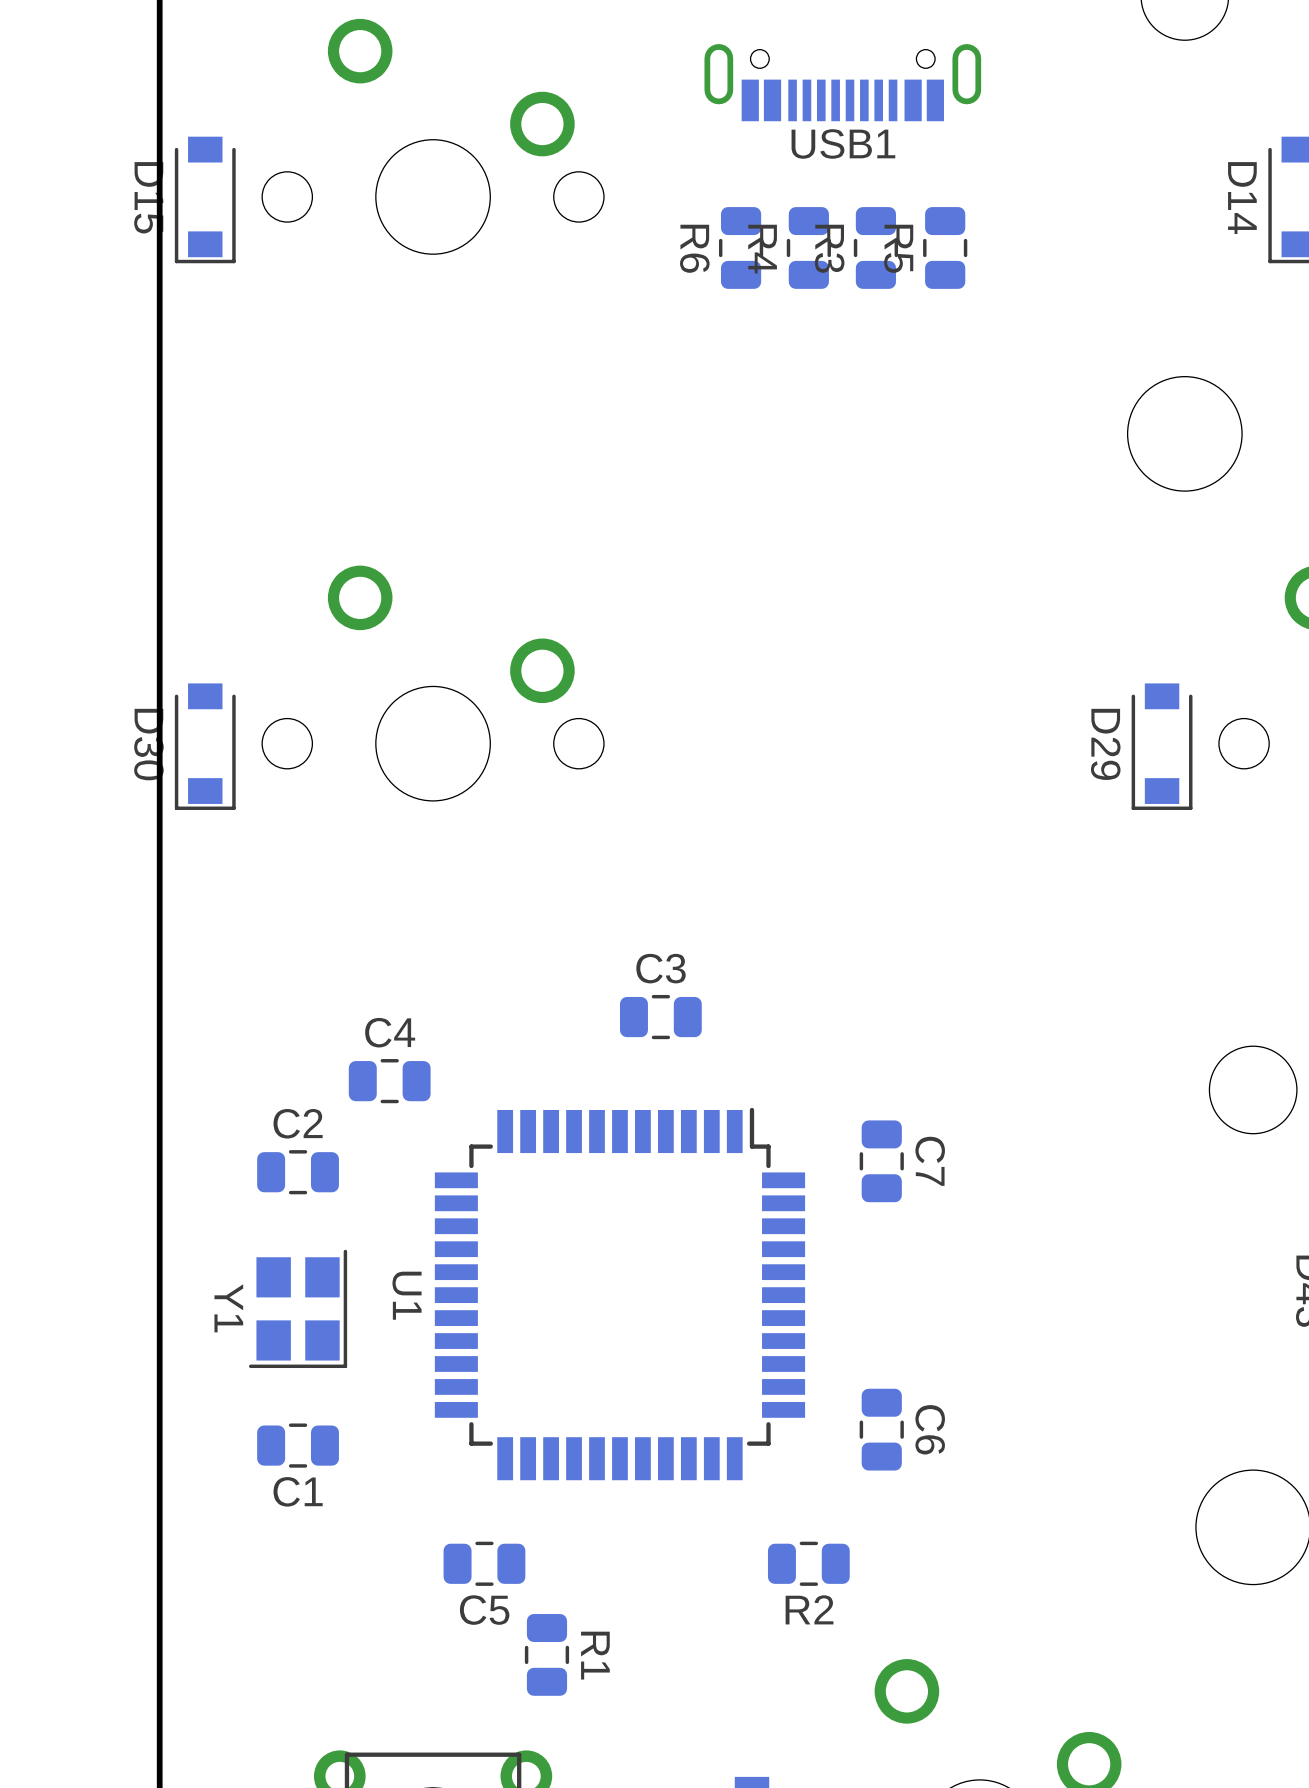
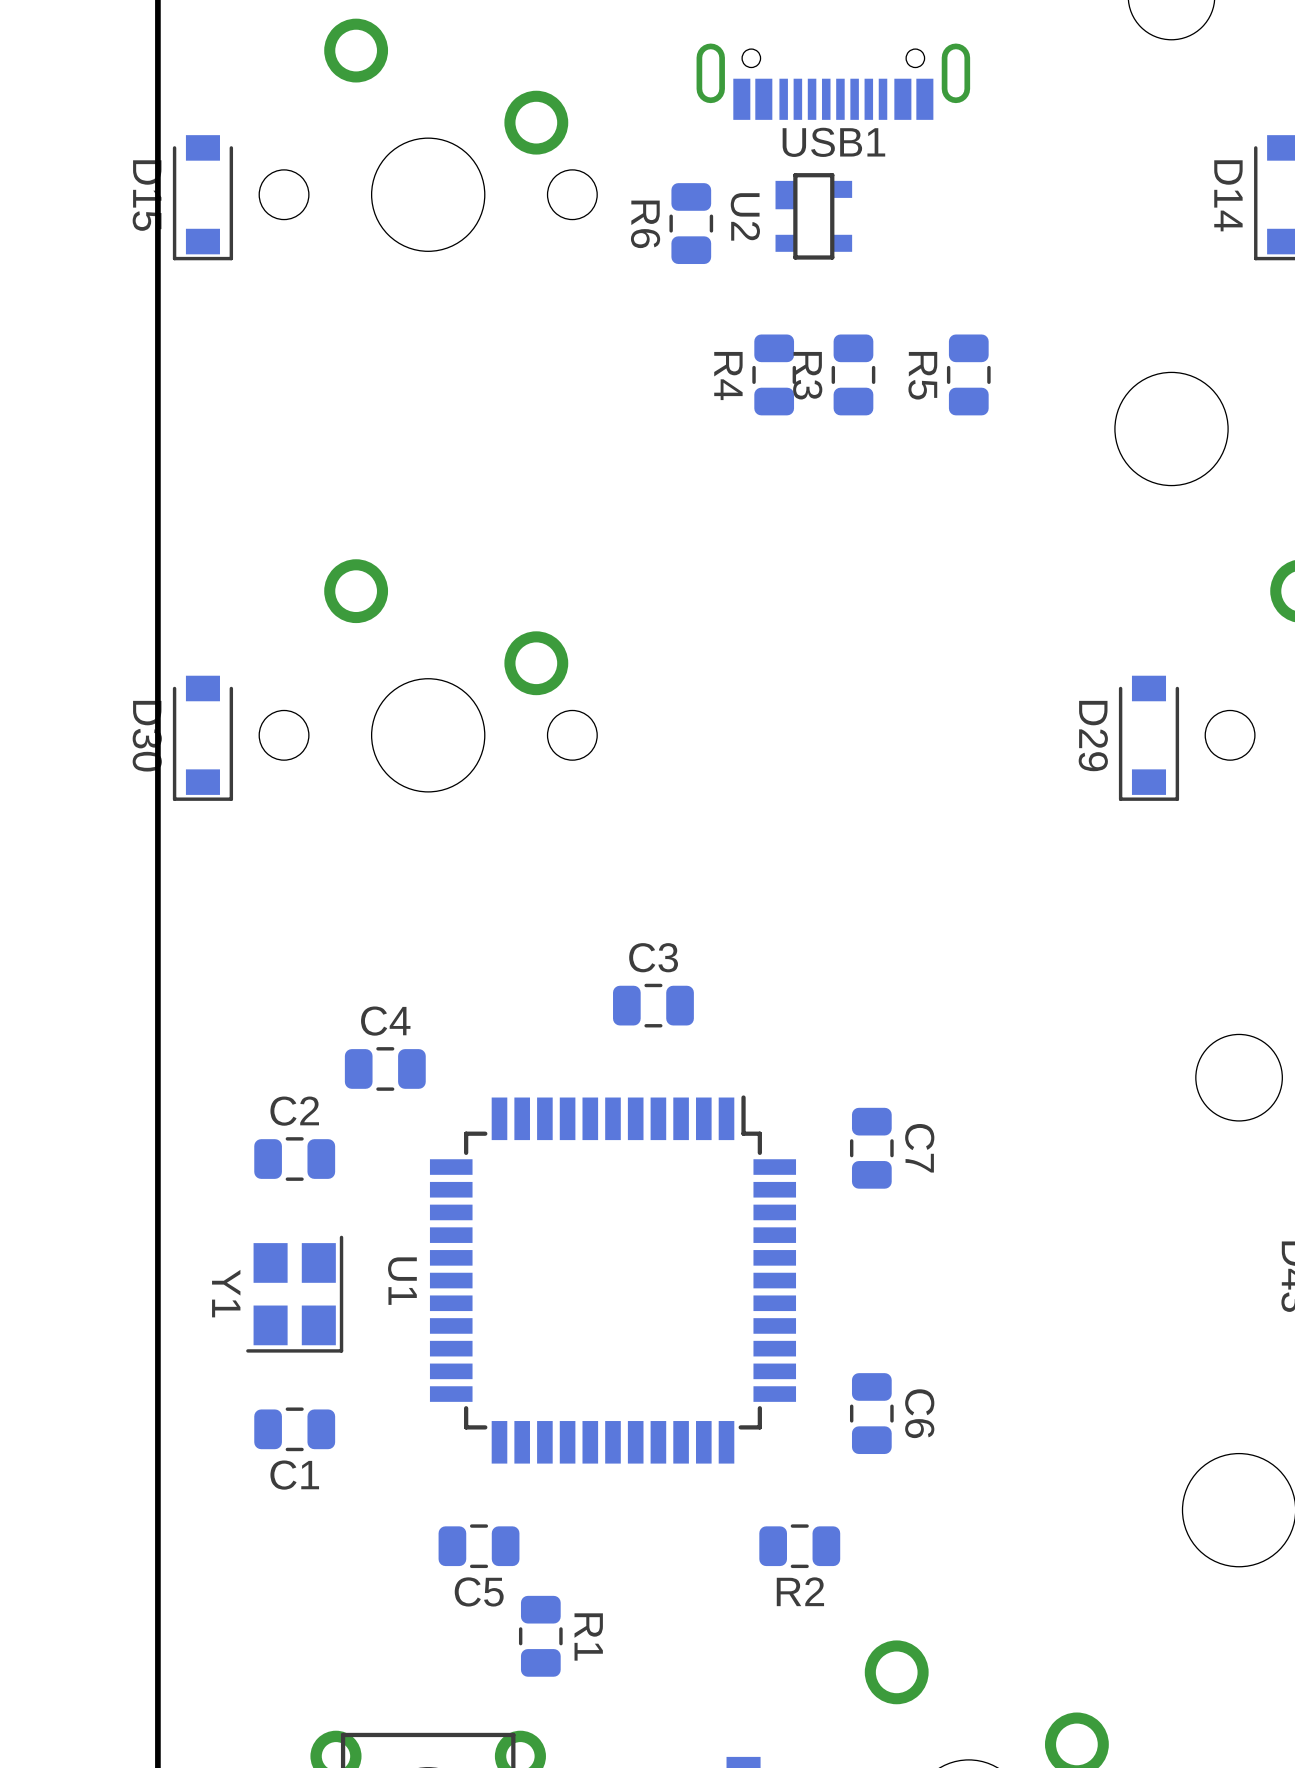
U2: none -> (813, 216)
R6 position: (741, 247) -> (691, 223)
R4 position: (808, 247) -> (774, 374)
R3 position: (875, 247) -> (853, 374)
R5 position: (945, 247) -> (968, 374)

